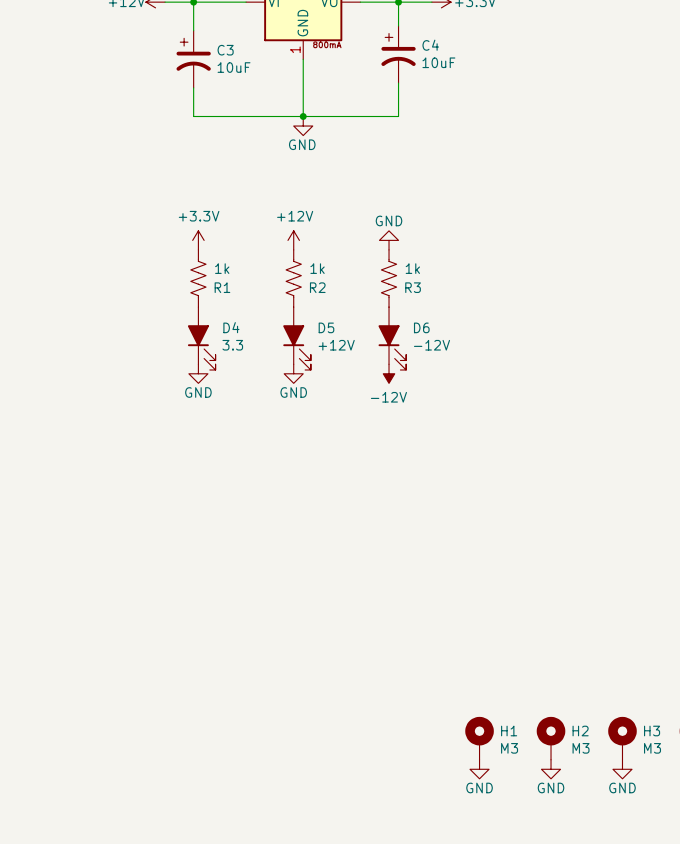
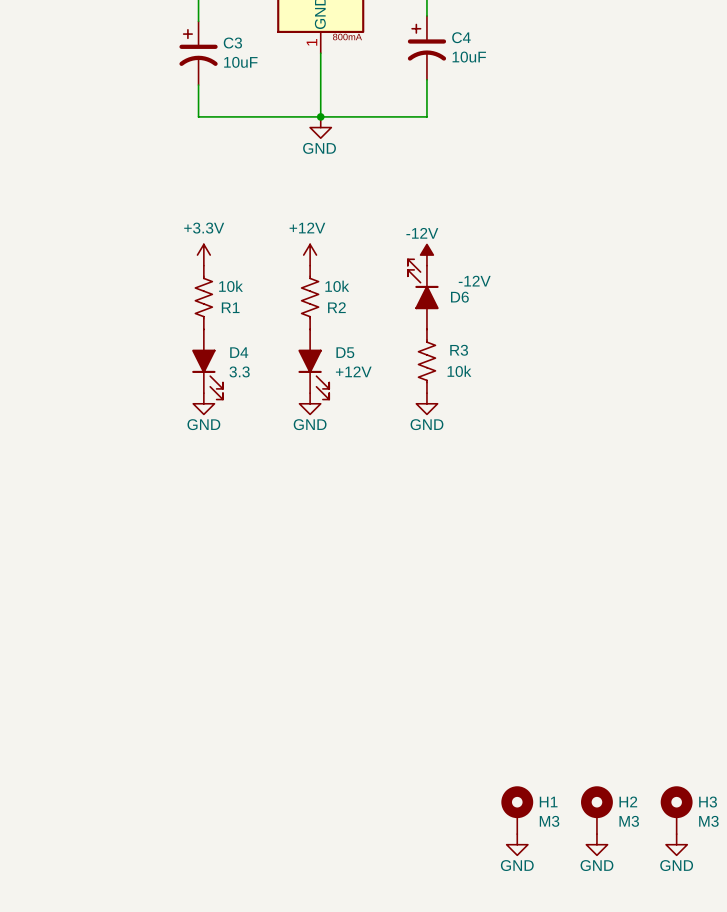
power symbol rotation: 0° (389, 240) -> 180° (426, 403)
power symbol position: GND (389, 240) -> GND (426, 403)
R1 value: 1k (222, 268) -> 10k (231, 286)
R2 value: 1k (317, 268) -> 10k (337, 286)
R3 value: 1k (412, 268) -> 10k (459, 371)
R3 position: (389, 278) -> (426, 361)
R3 name position: R3 (413, 287) -> R3 (459, 350)
D6 position: (392, 338) -> (423, 294)
D6 value position: -12V (431, 345) -> -12V (474, 281)
D6 rotation: 0° (392, 347) -> 180° (423, 284)
power symbol rotation: 0° (389, 373) -> 180° (426, 255)
power symbol position: -12V (389, 373) -> -12V (426, 255)

